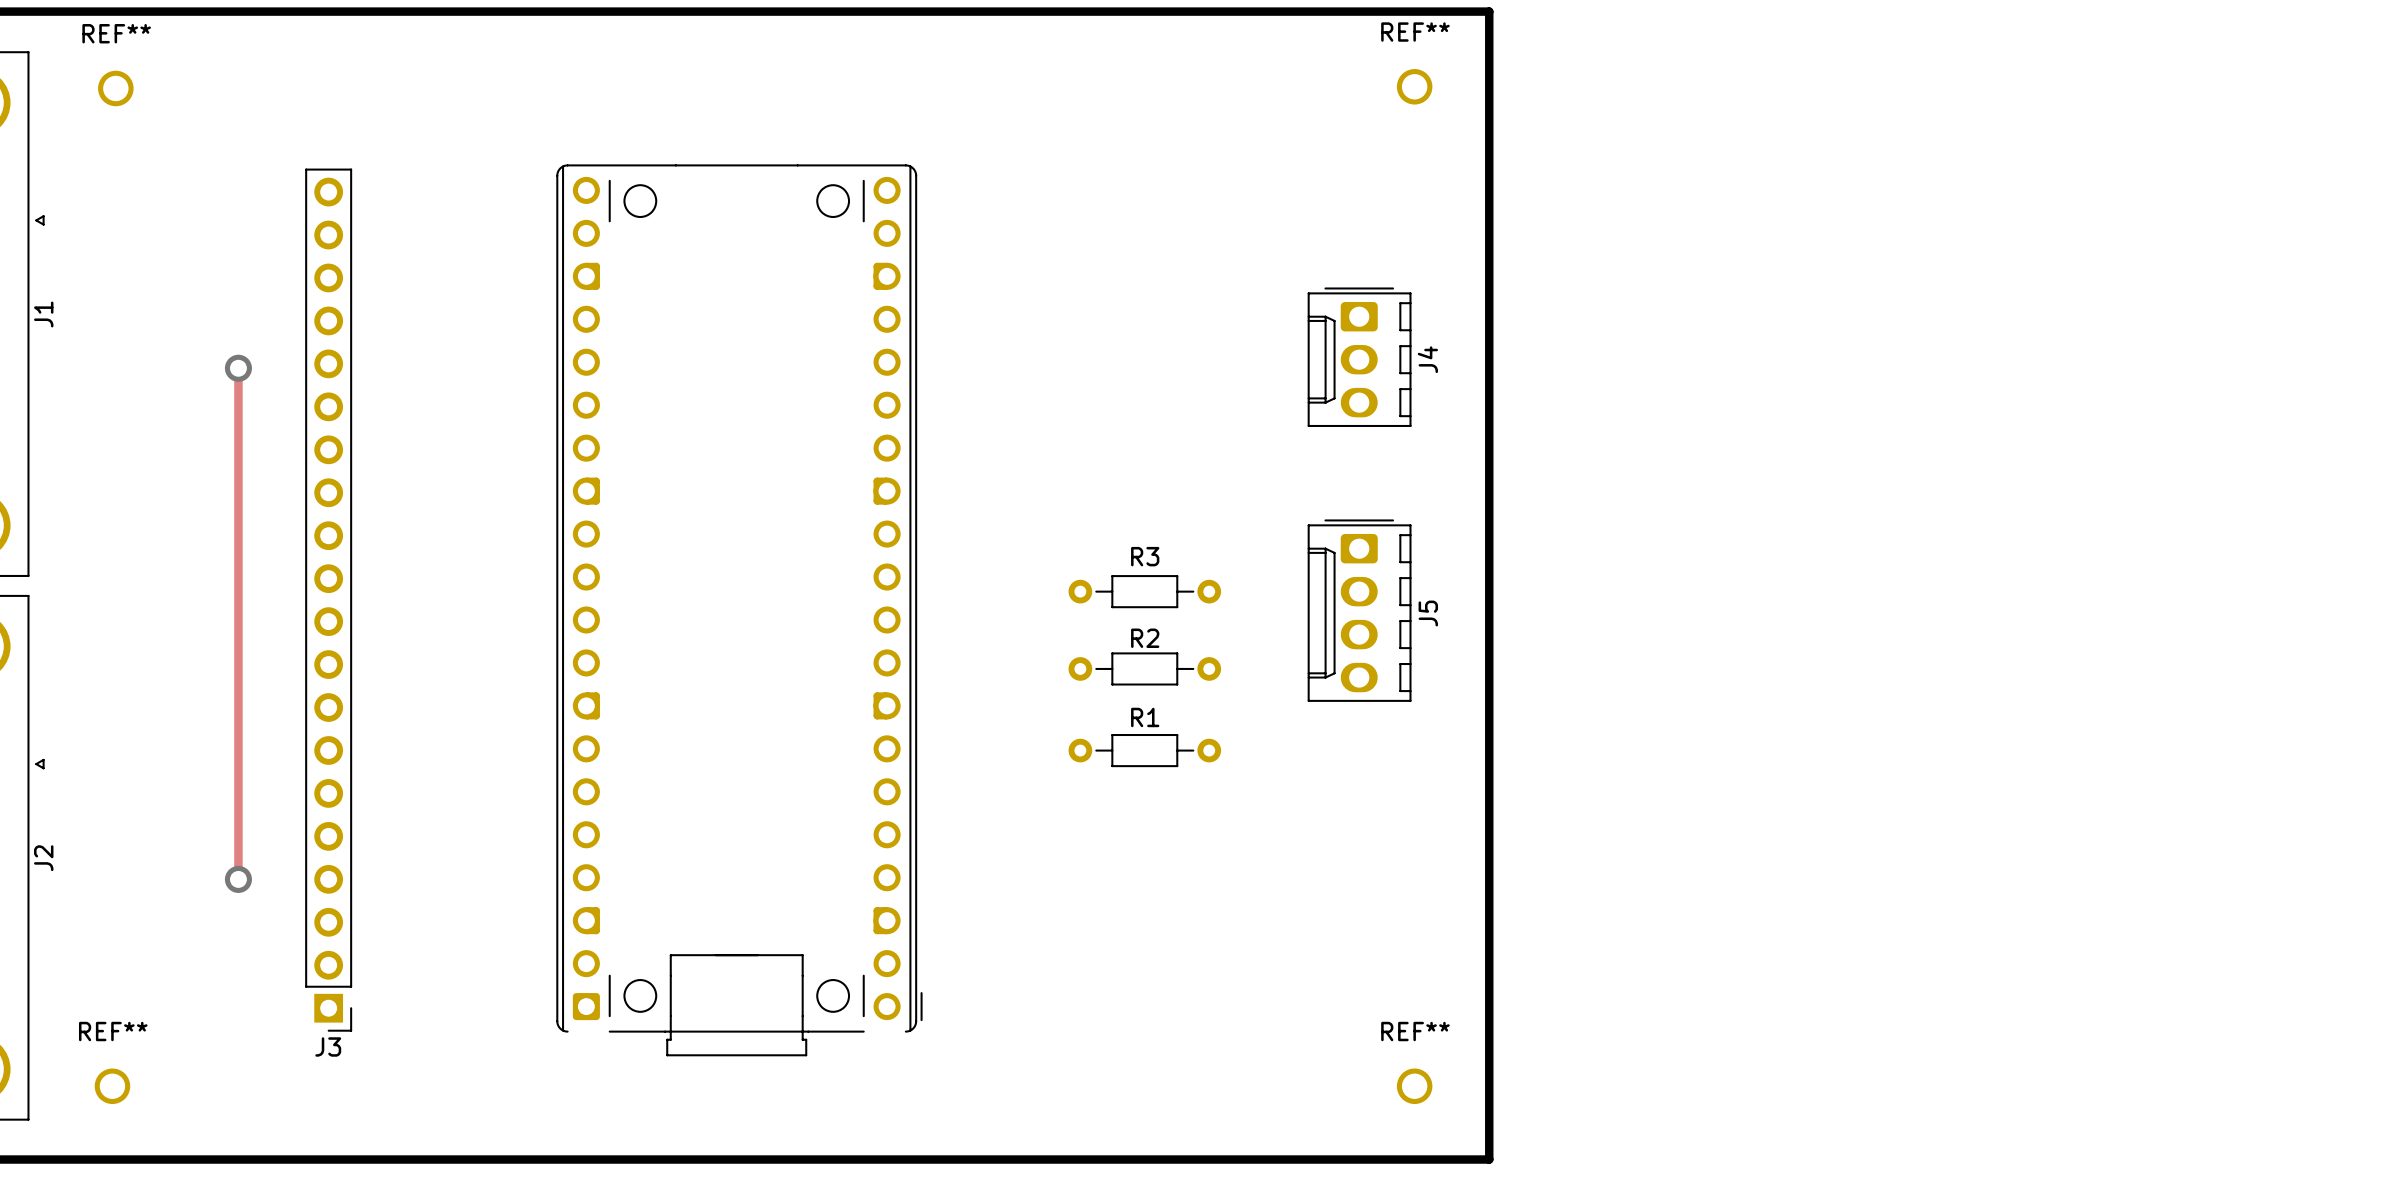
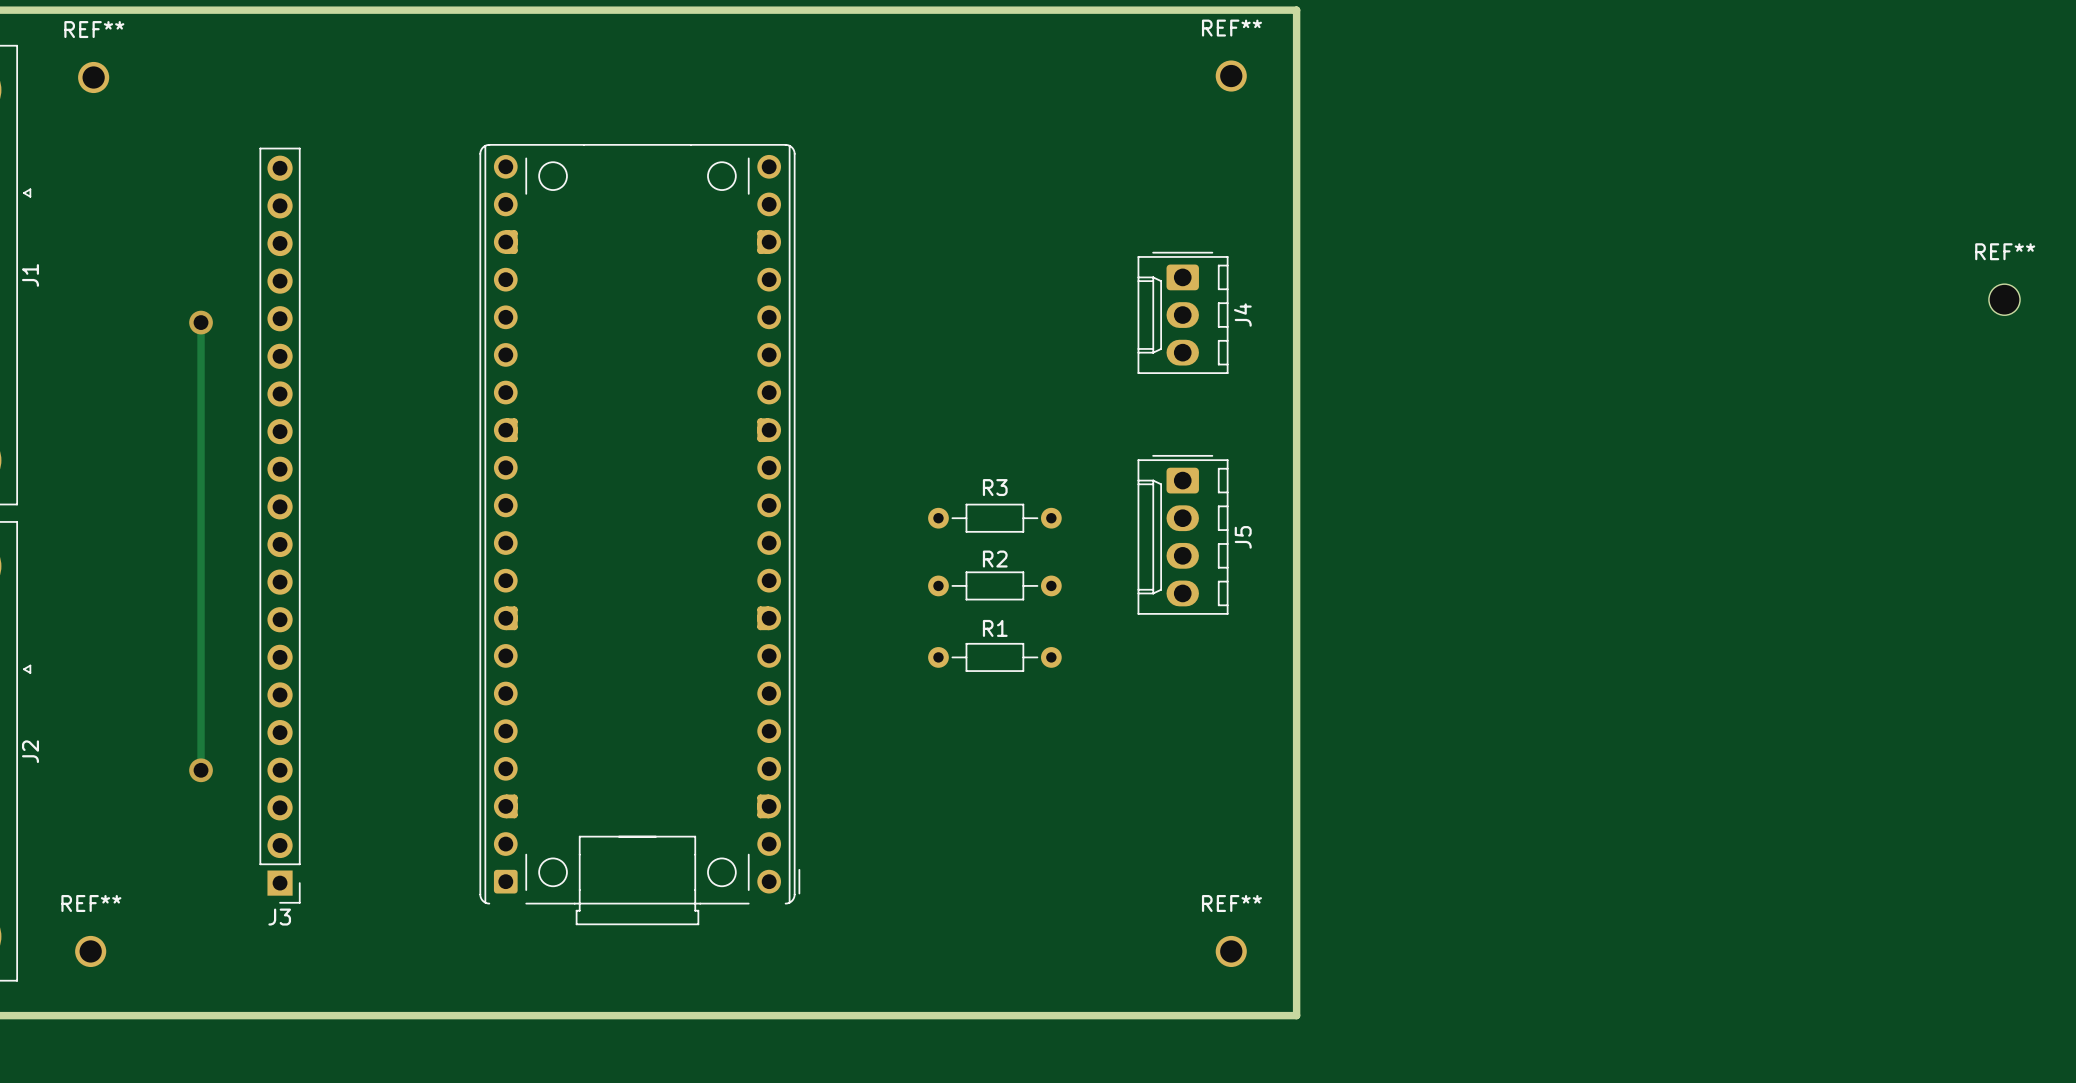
REF**: none -> (2004, 299)

